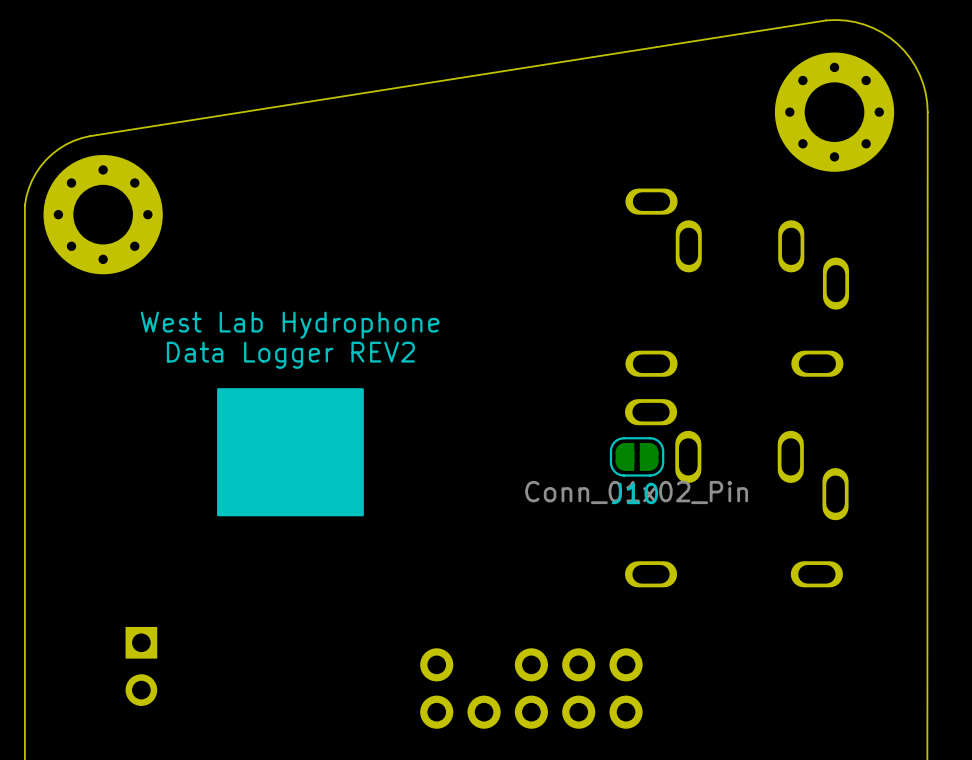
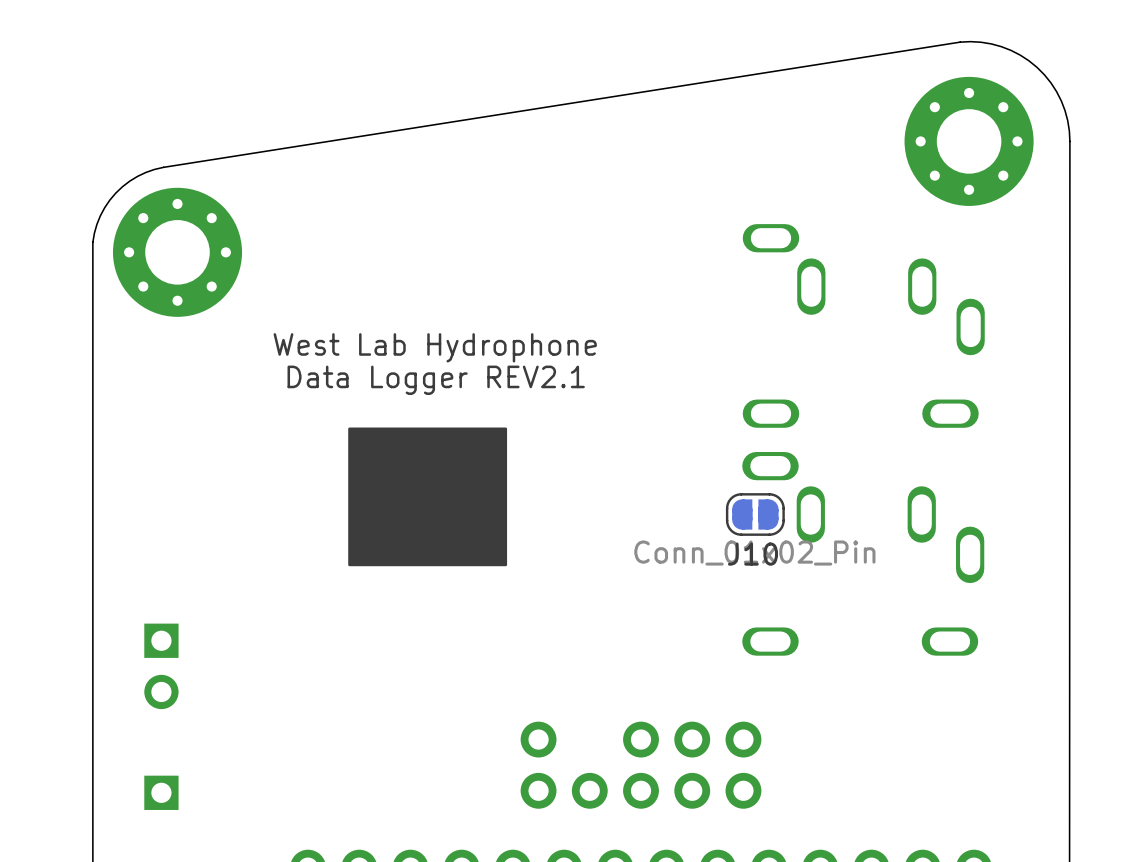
text position: West Lab Hydrophone (290, 325) -> West Lab Hydrophone (435, 347)
text: Data Logger REV2 (290, 355) -> Data Logger REV2.1 (436, 380)
drawing position: (290, 452) -> (427, 496)
part position: (141, 666) -> (161, 666)
part: none -> (161, 792)

